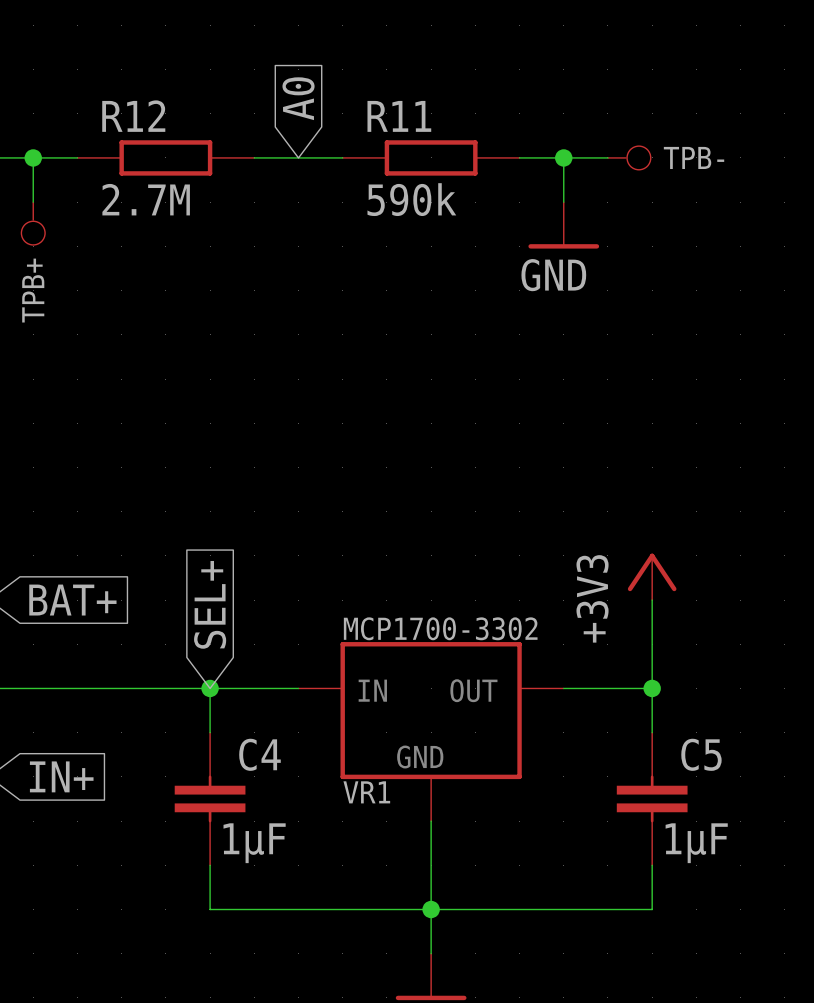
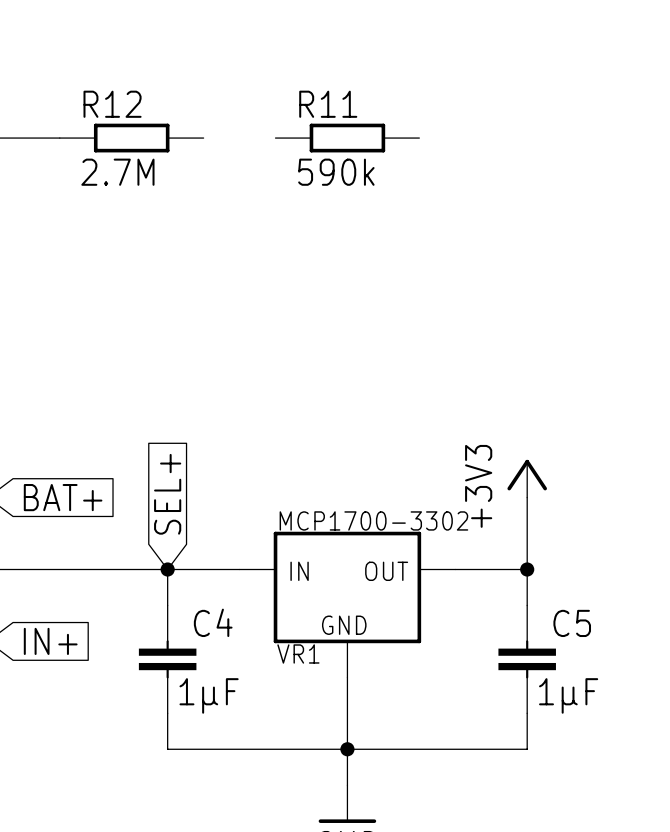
global label: A0 (298, 98) -> none
wire: (33, 157) (33, 202) -> none
junction: (33, 157) -> none
wire: (254, 157) (342, 157) -> none
wire: (519, 157) (607, 157) -> none
wire: (563, 157) (563, 202) -> none
junction: (563, 157) -> none
TPB-: (629, 157) -> none
TPB+: (33, 223) -> none
power symbol: GND (563, 225) -> none

